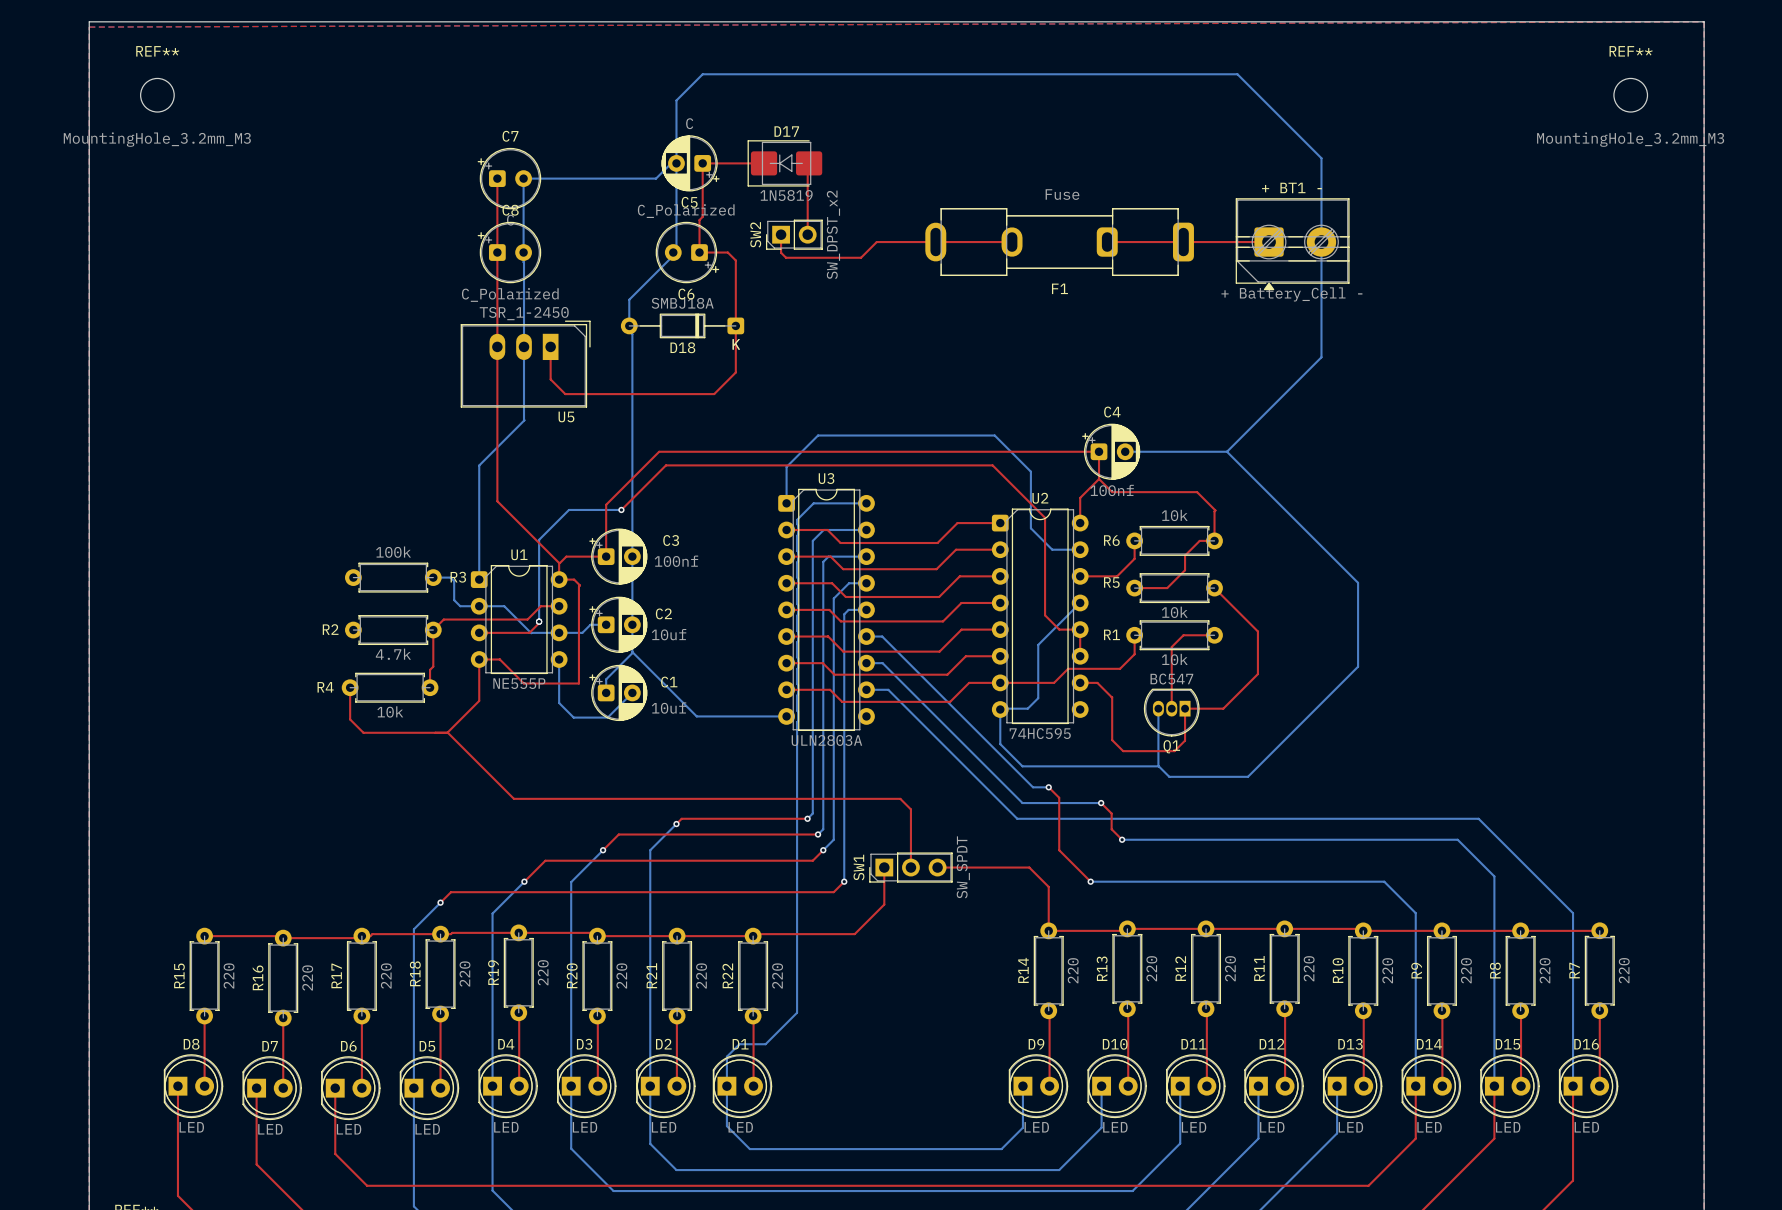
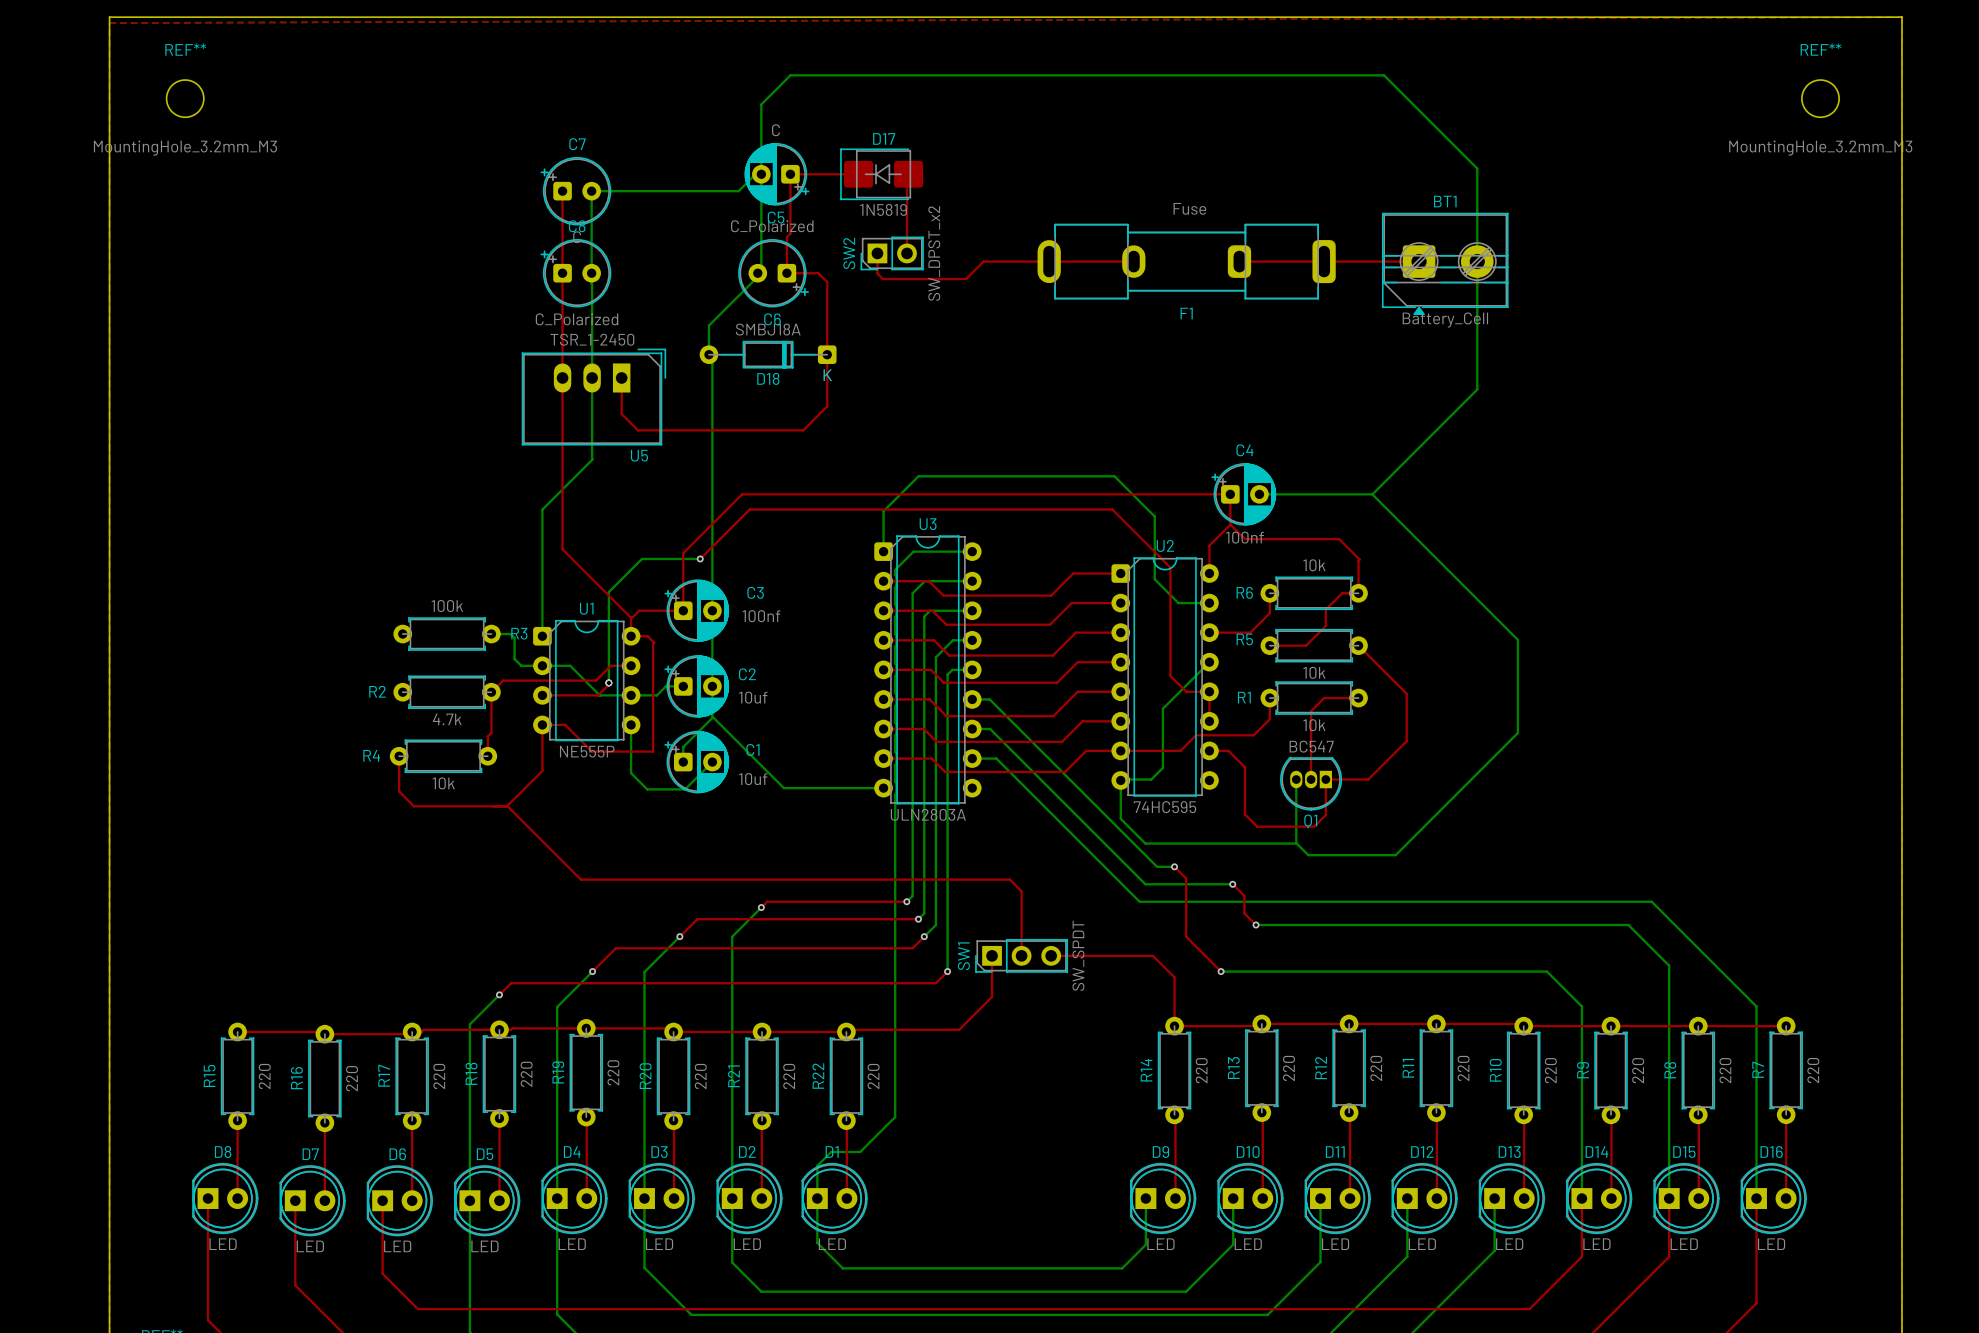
+ BT1 - name: + BT1 - (1291, 187) -> BT1 (1445, 201)
+ BT1 - value: + Battery_Cell - (1291, 294) -> Battery_Cell (1445, 320)

